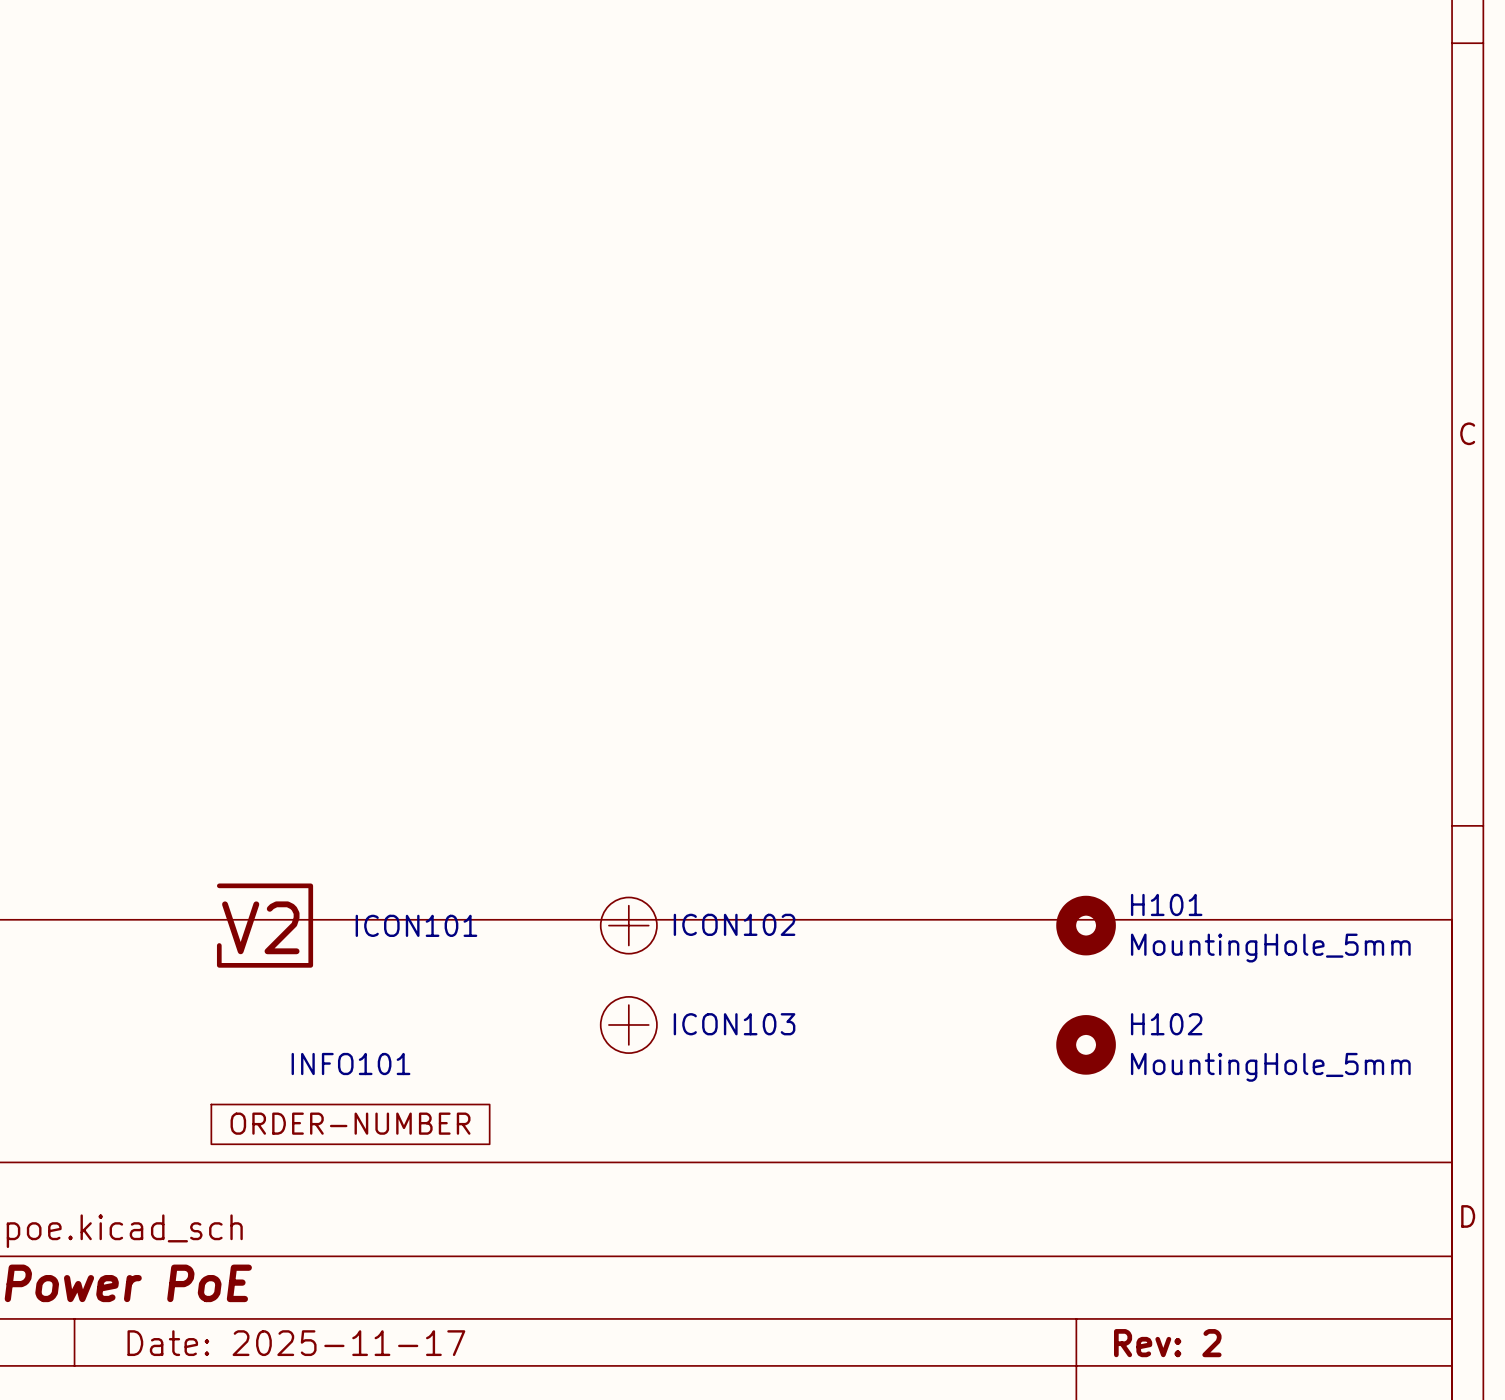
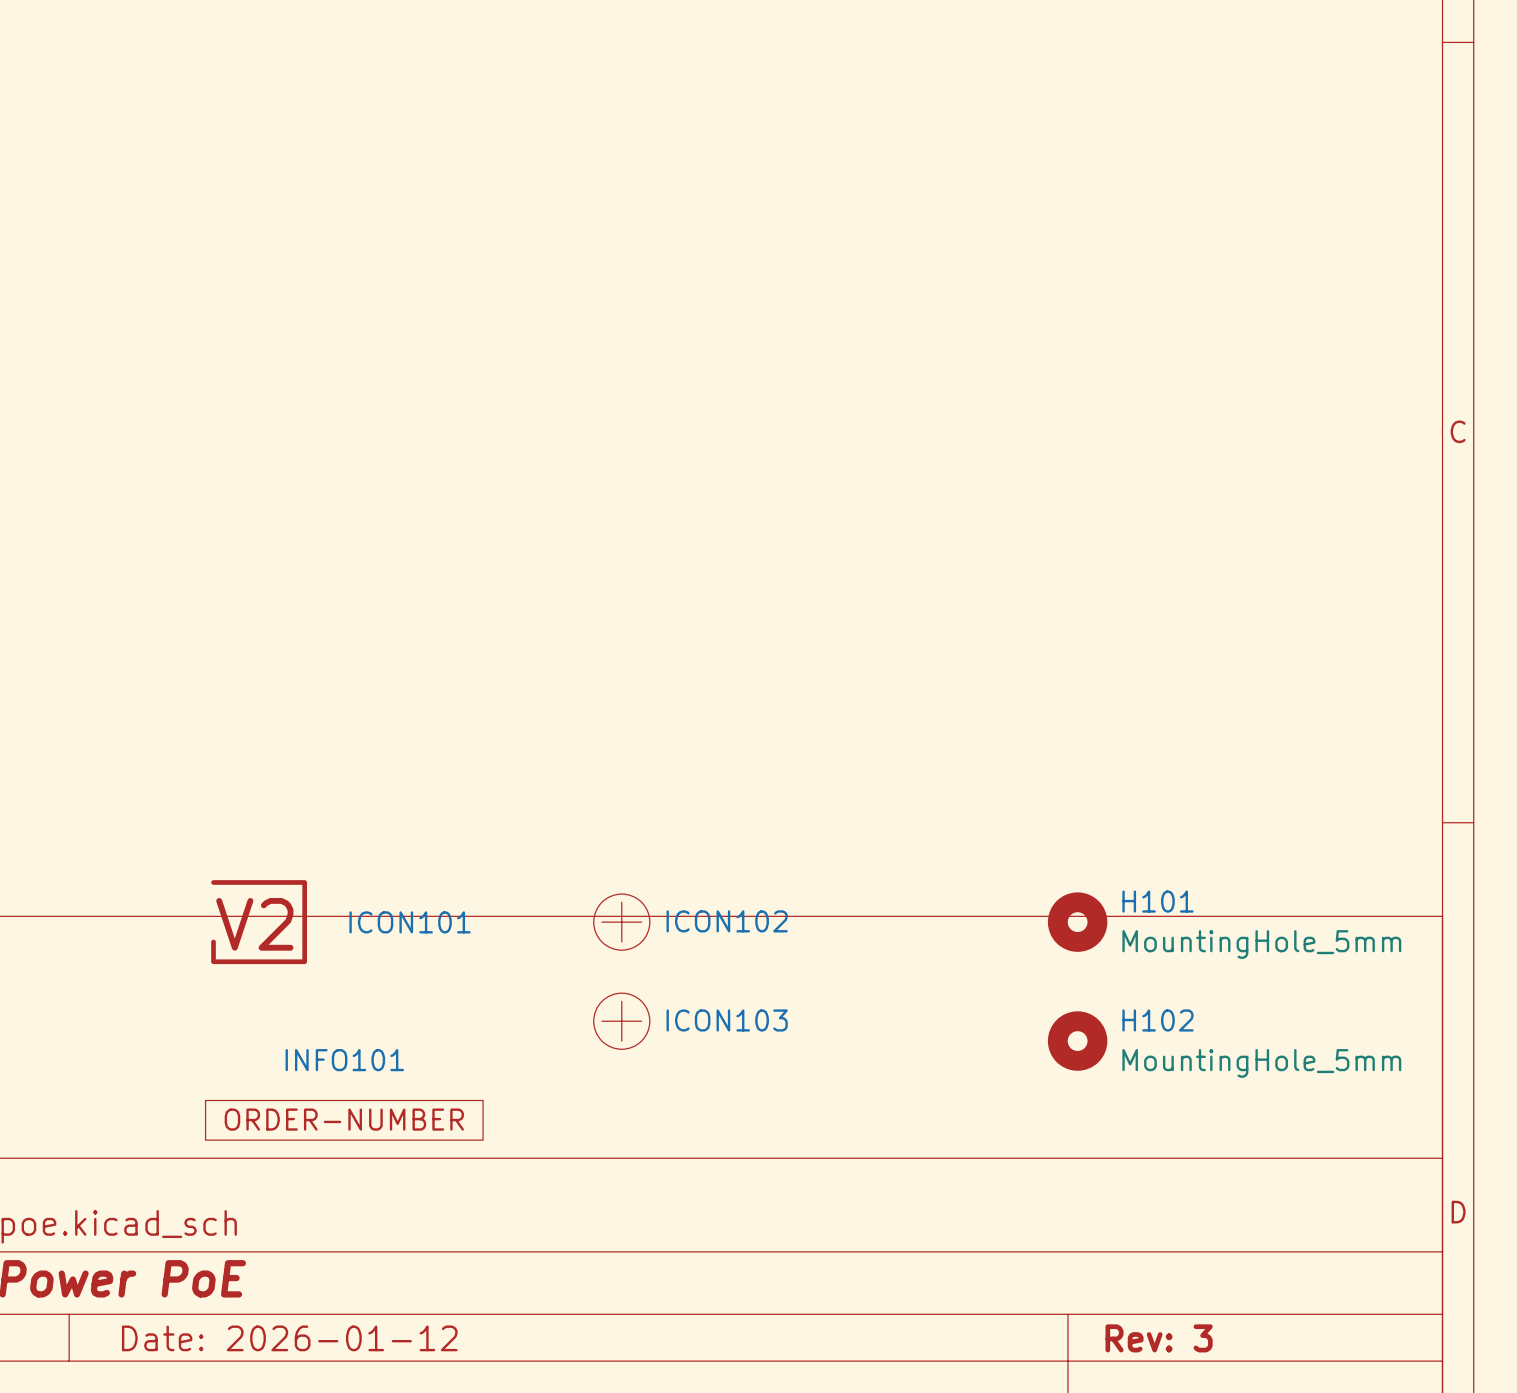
title block: Date: 2025-11-17 (296, 1343) -> Date: 2026-01-12 (289, 1338)
title block: Rev: 2 (1167, 1343) -> Rev: 3 (1159, 1338)

